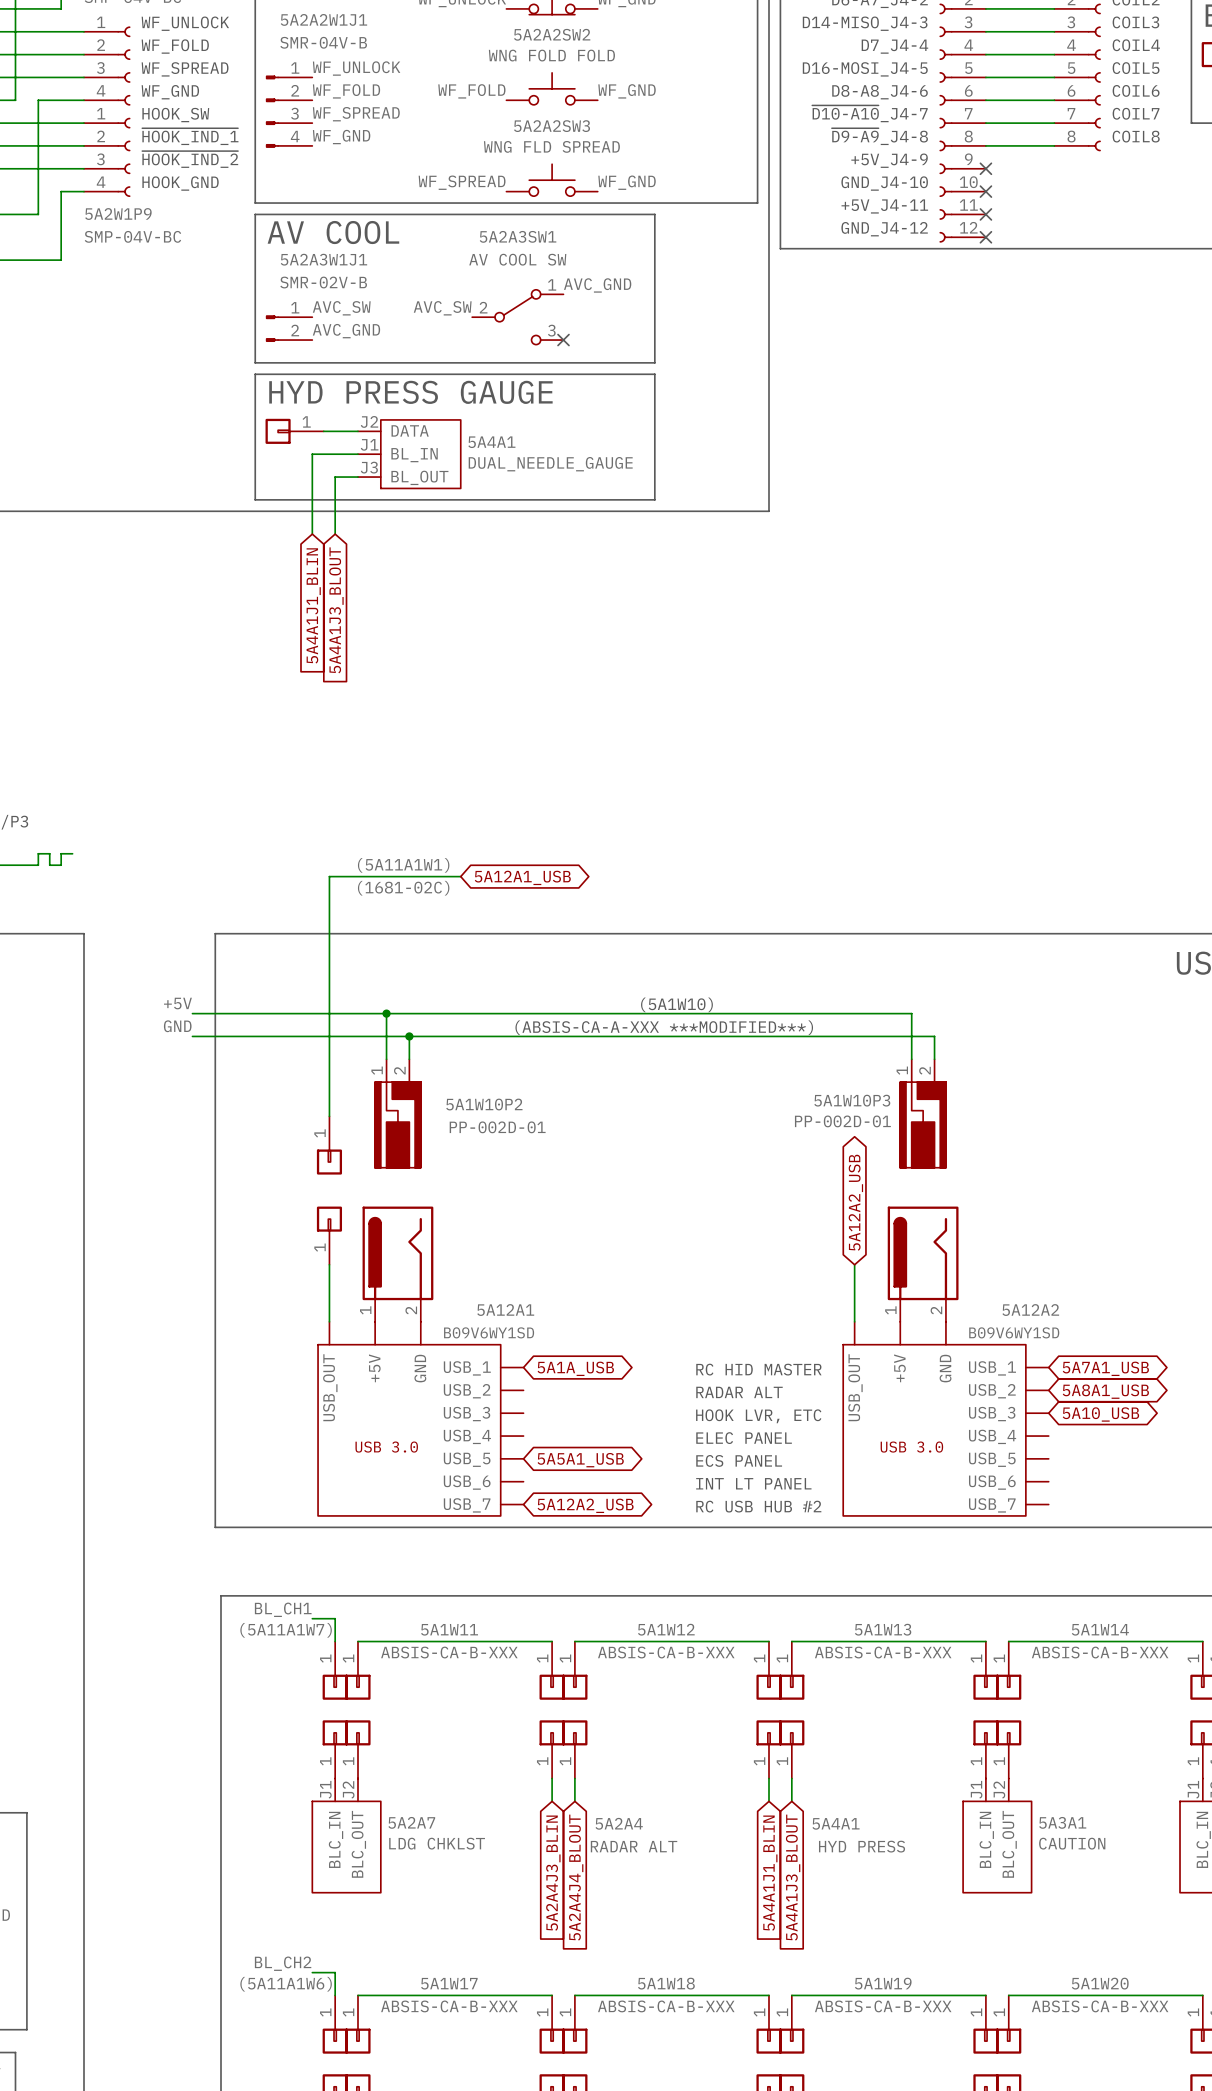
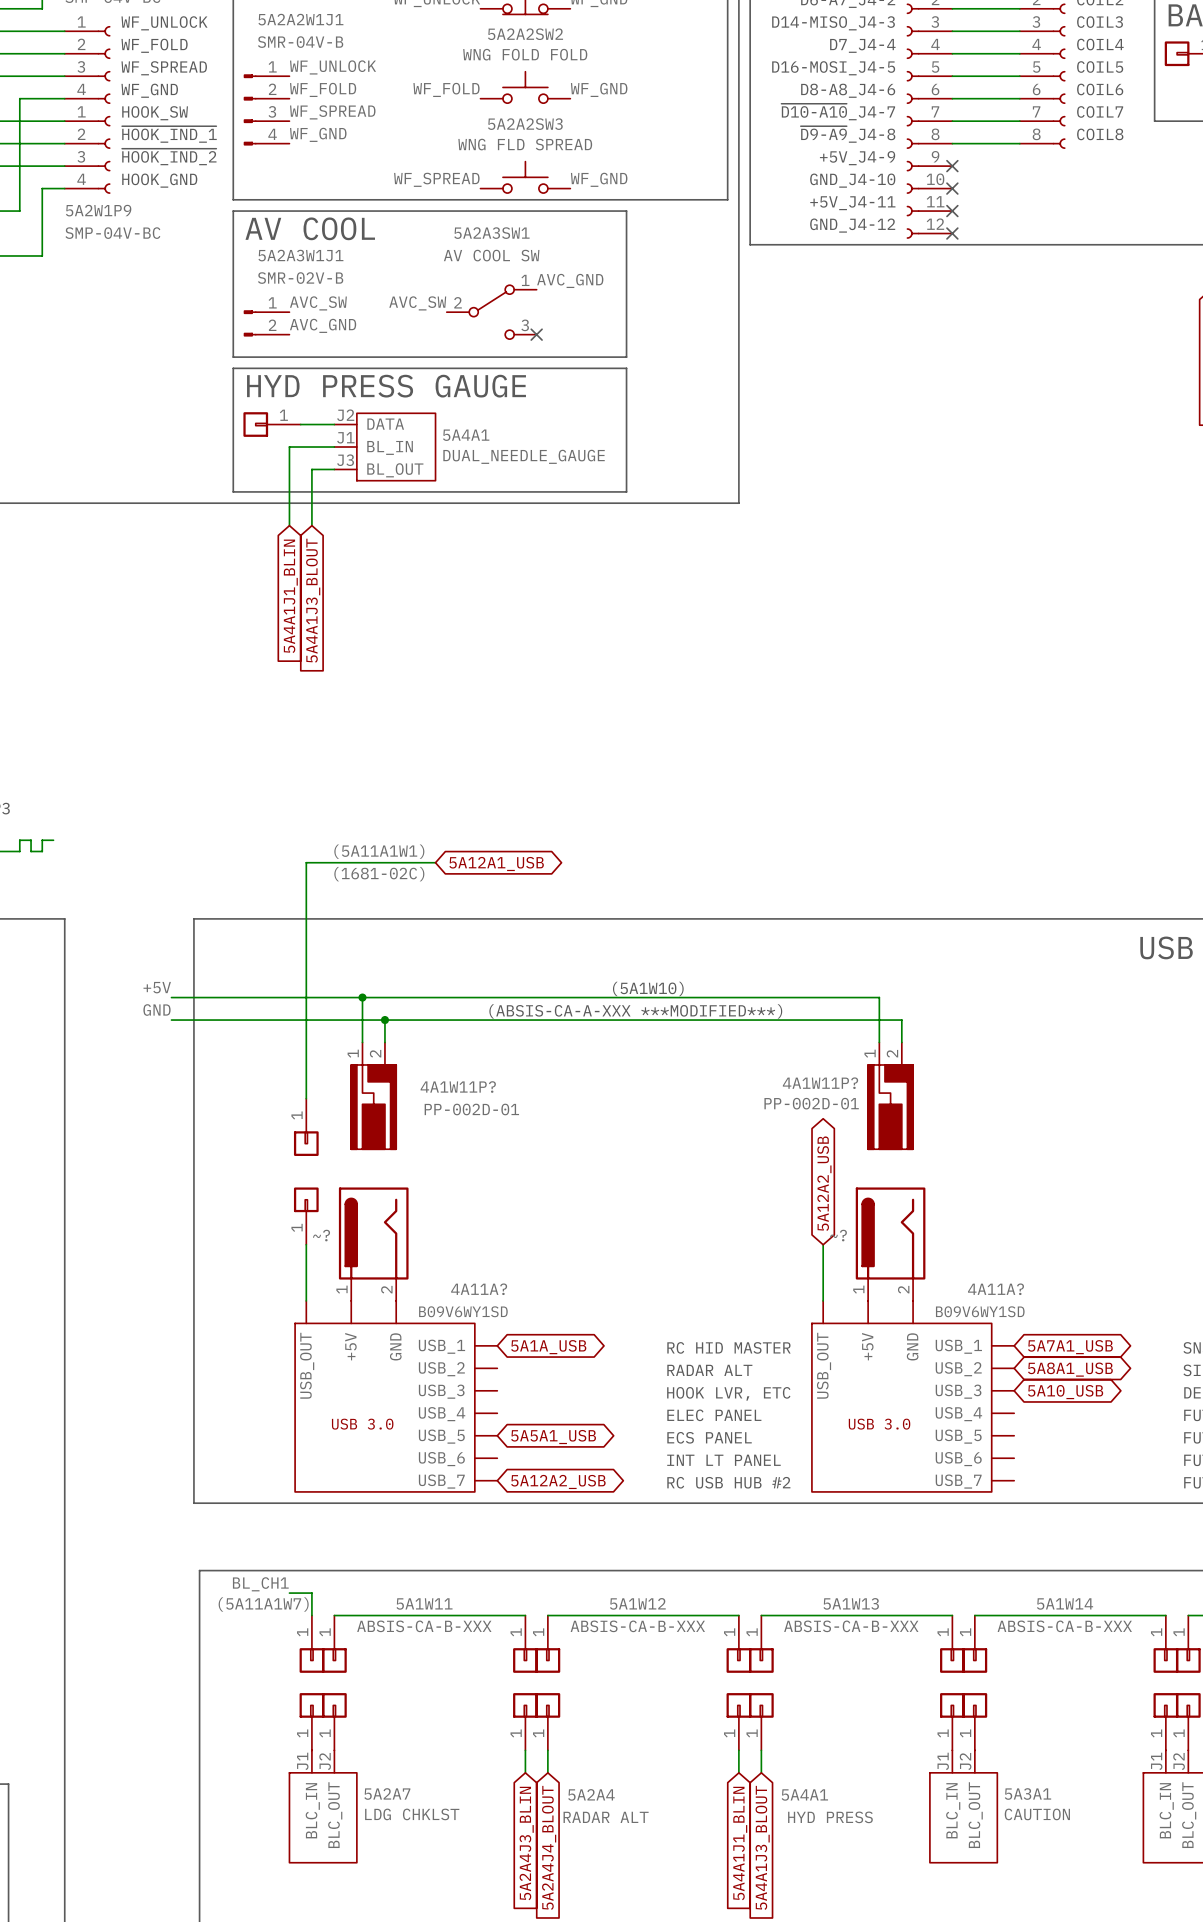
5A1W10P3 name: 5A1W10P3 (852, 1100) -> 4A1W11P? (820, 1083)
5A1W10P2 name: 5A1W10P2 (484, 1104) -> 4A1W11P? (458, 1087)
part name: none -> ~? (321, 1235)
part name: none -> ~? (838, 1235)
5A12A1 name: 5A12A1 (505, 1310) -> 4A11A? (479, 1289)
5A12A2 name: 5A12A2 (1030, 1310) -> 4A11A? (995, 1289)

